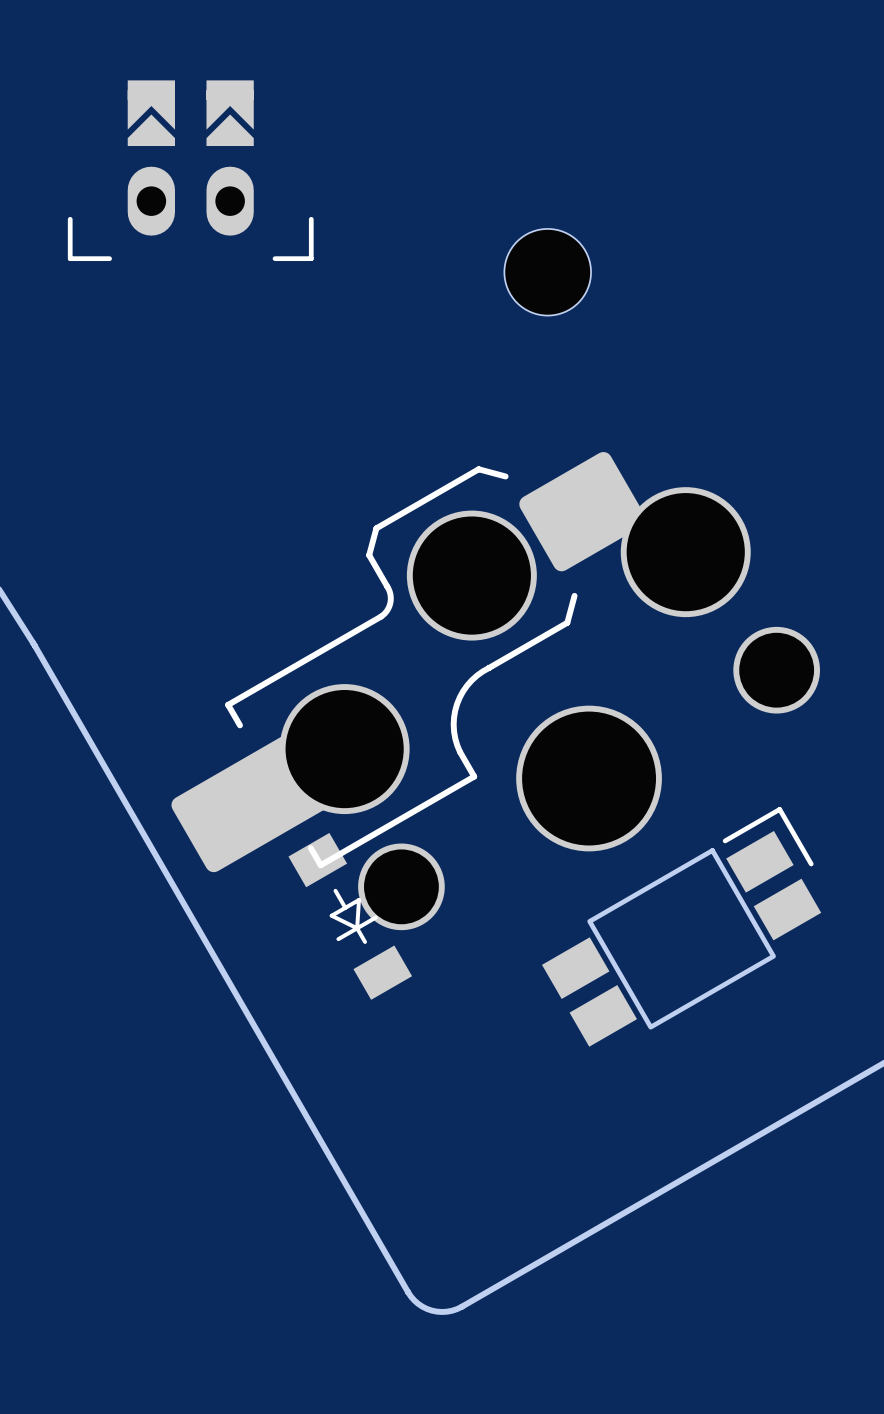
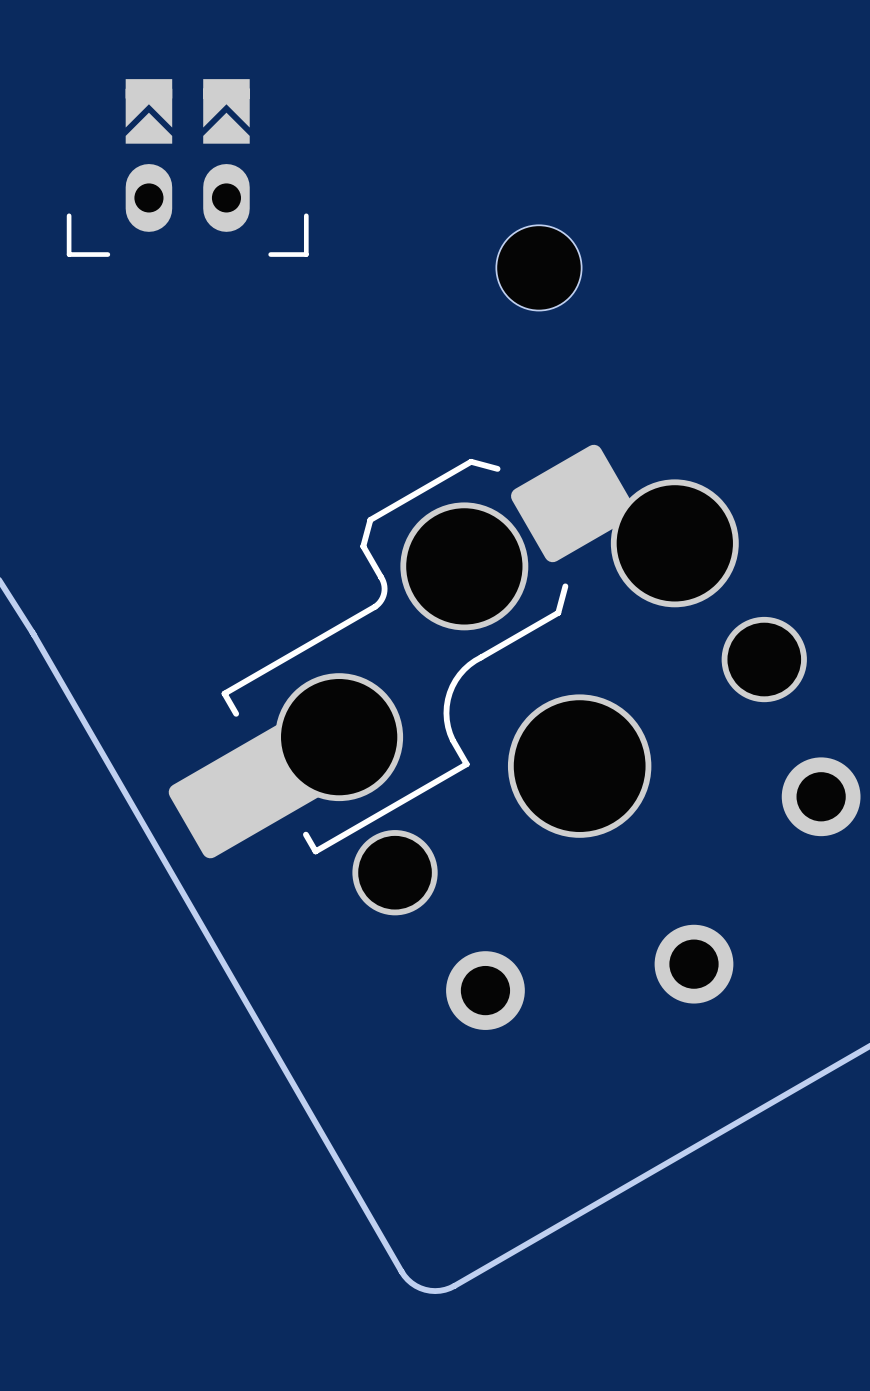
part: (495, 691) -> none
part: none -> (514, 737)
part: (350, 916) -> none
part: (681, 926) -> none

